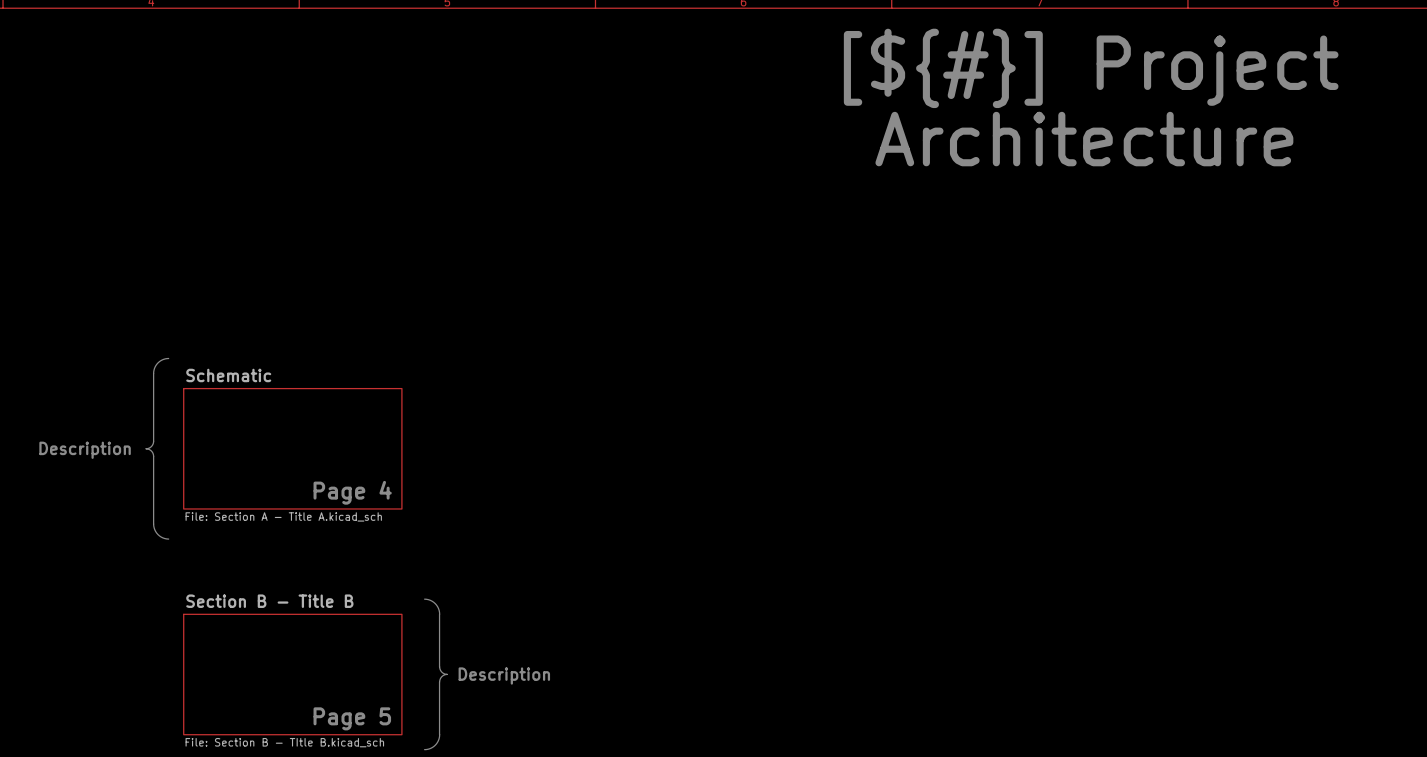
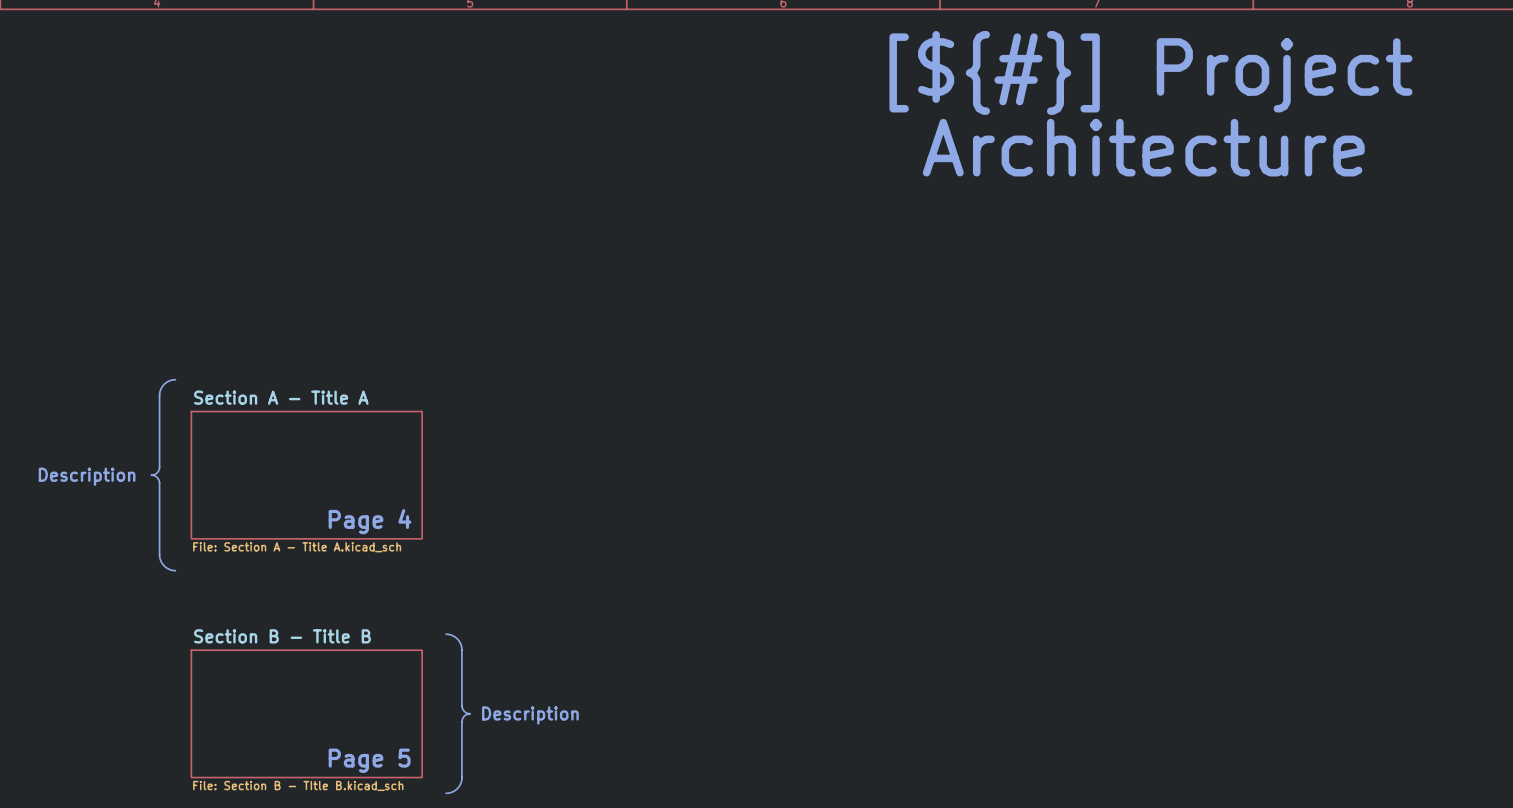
sheet Schematic name: Schematic (228, 375) -> Section A - Title A (281, 397)

